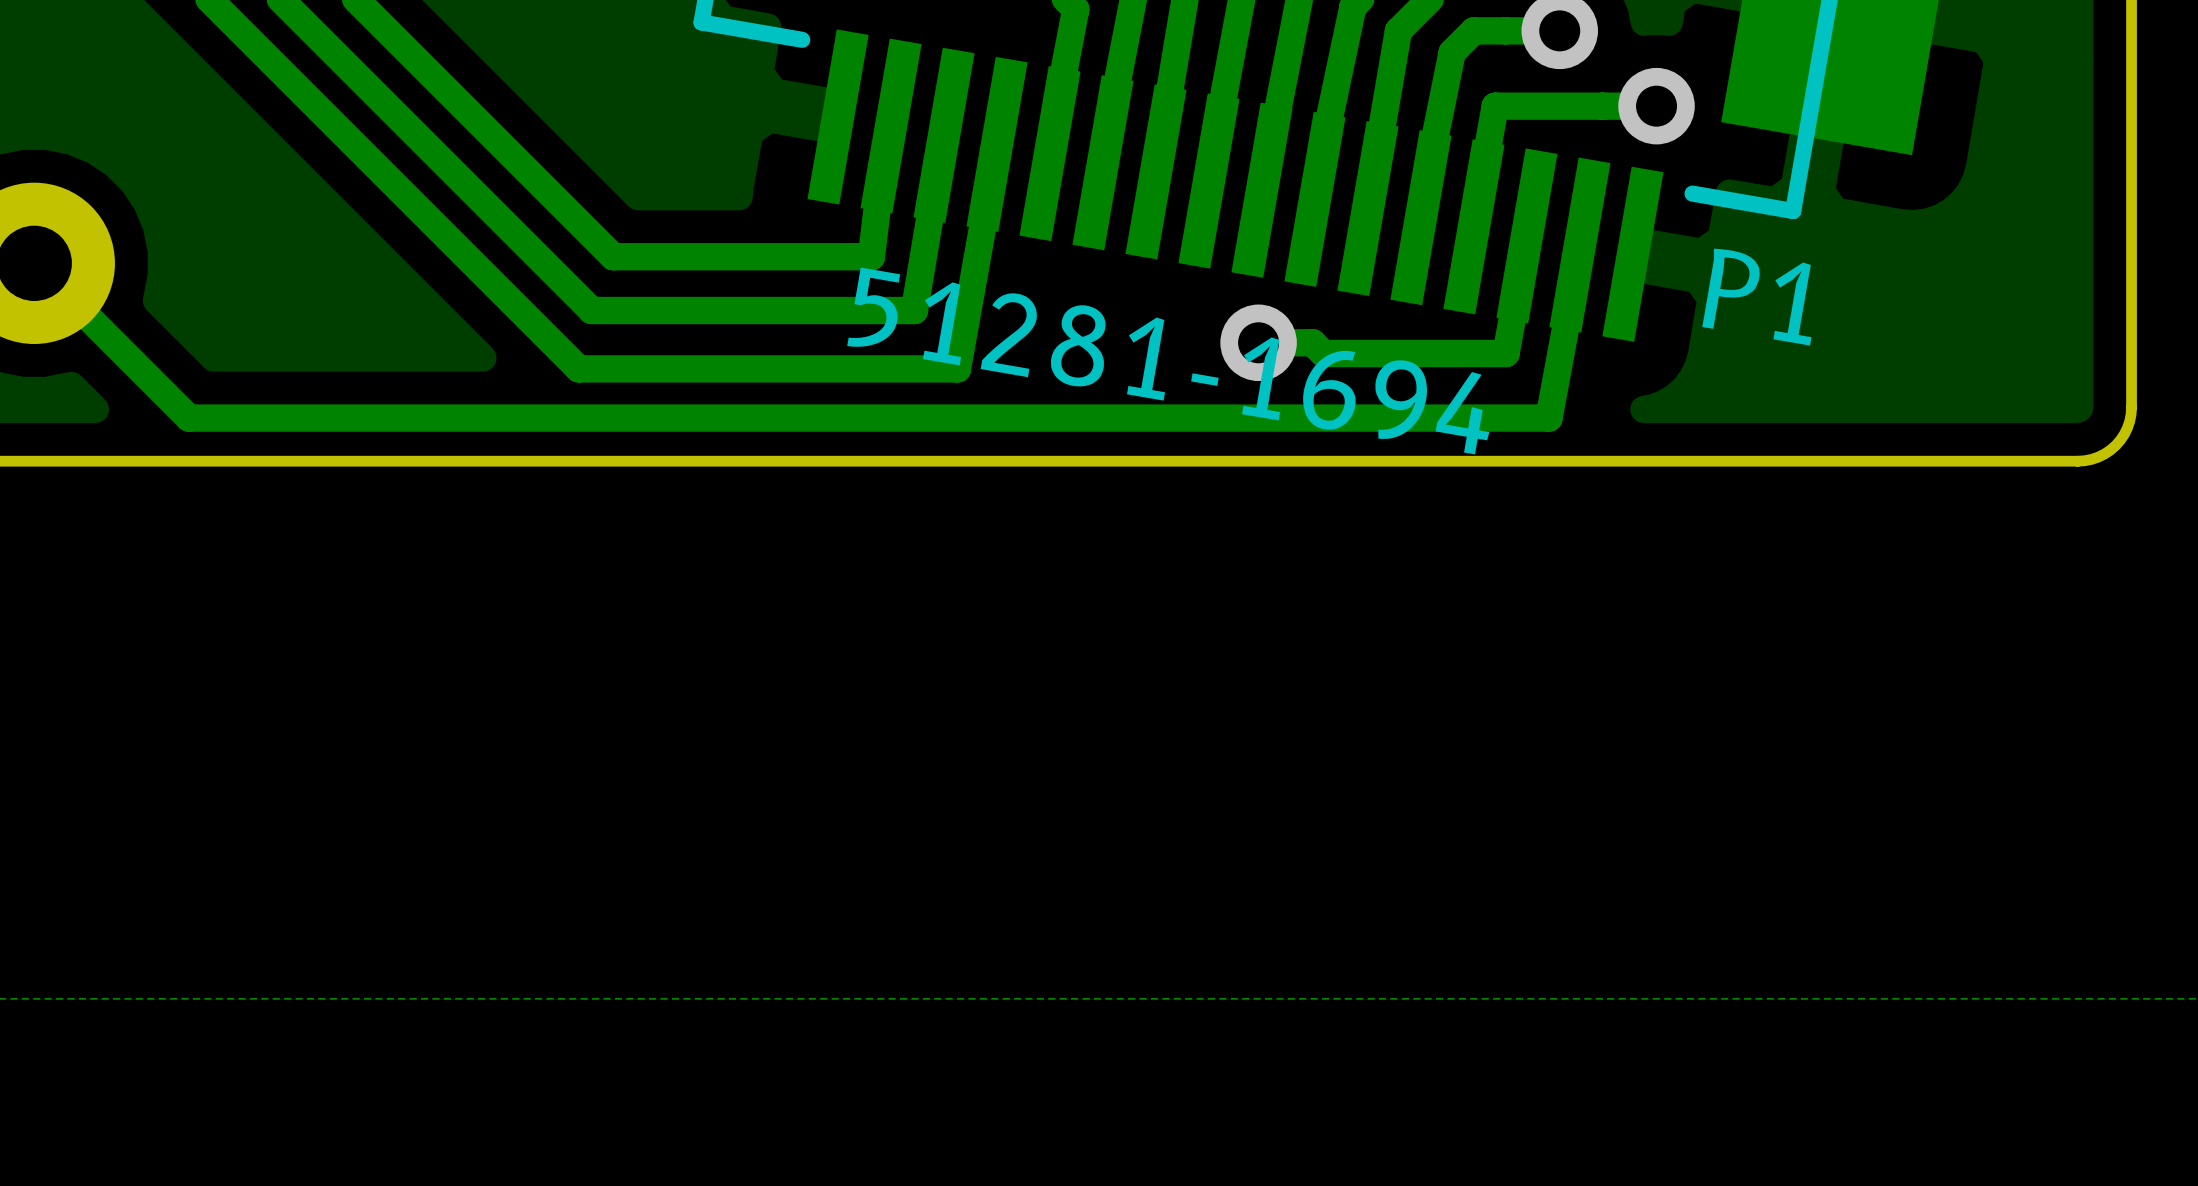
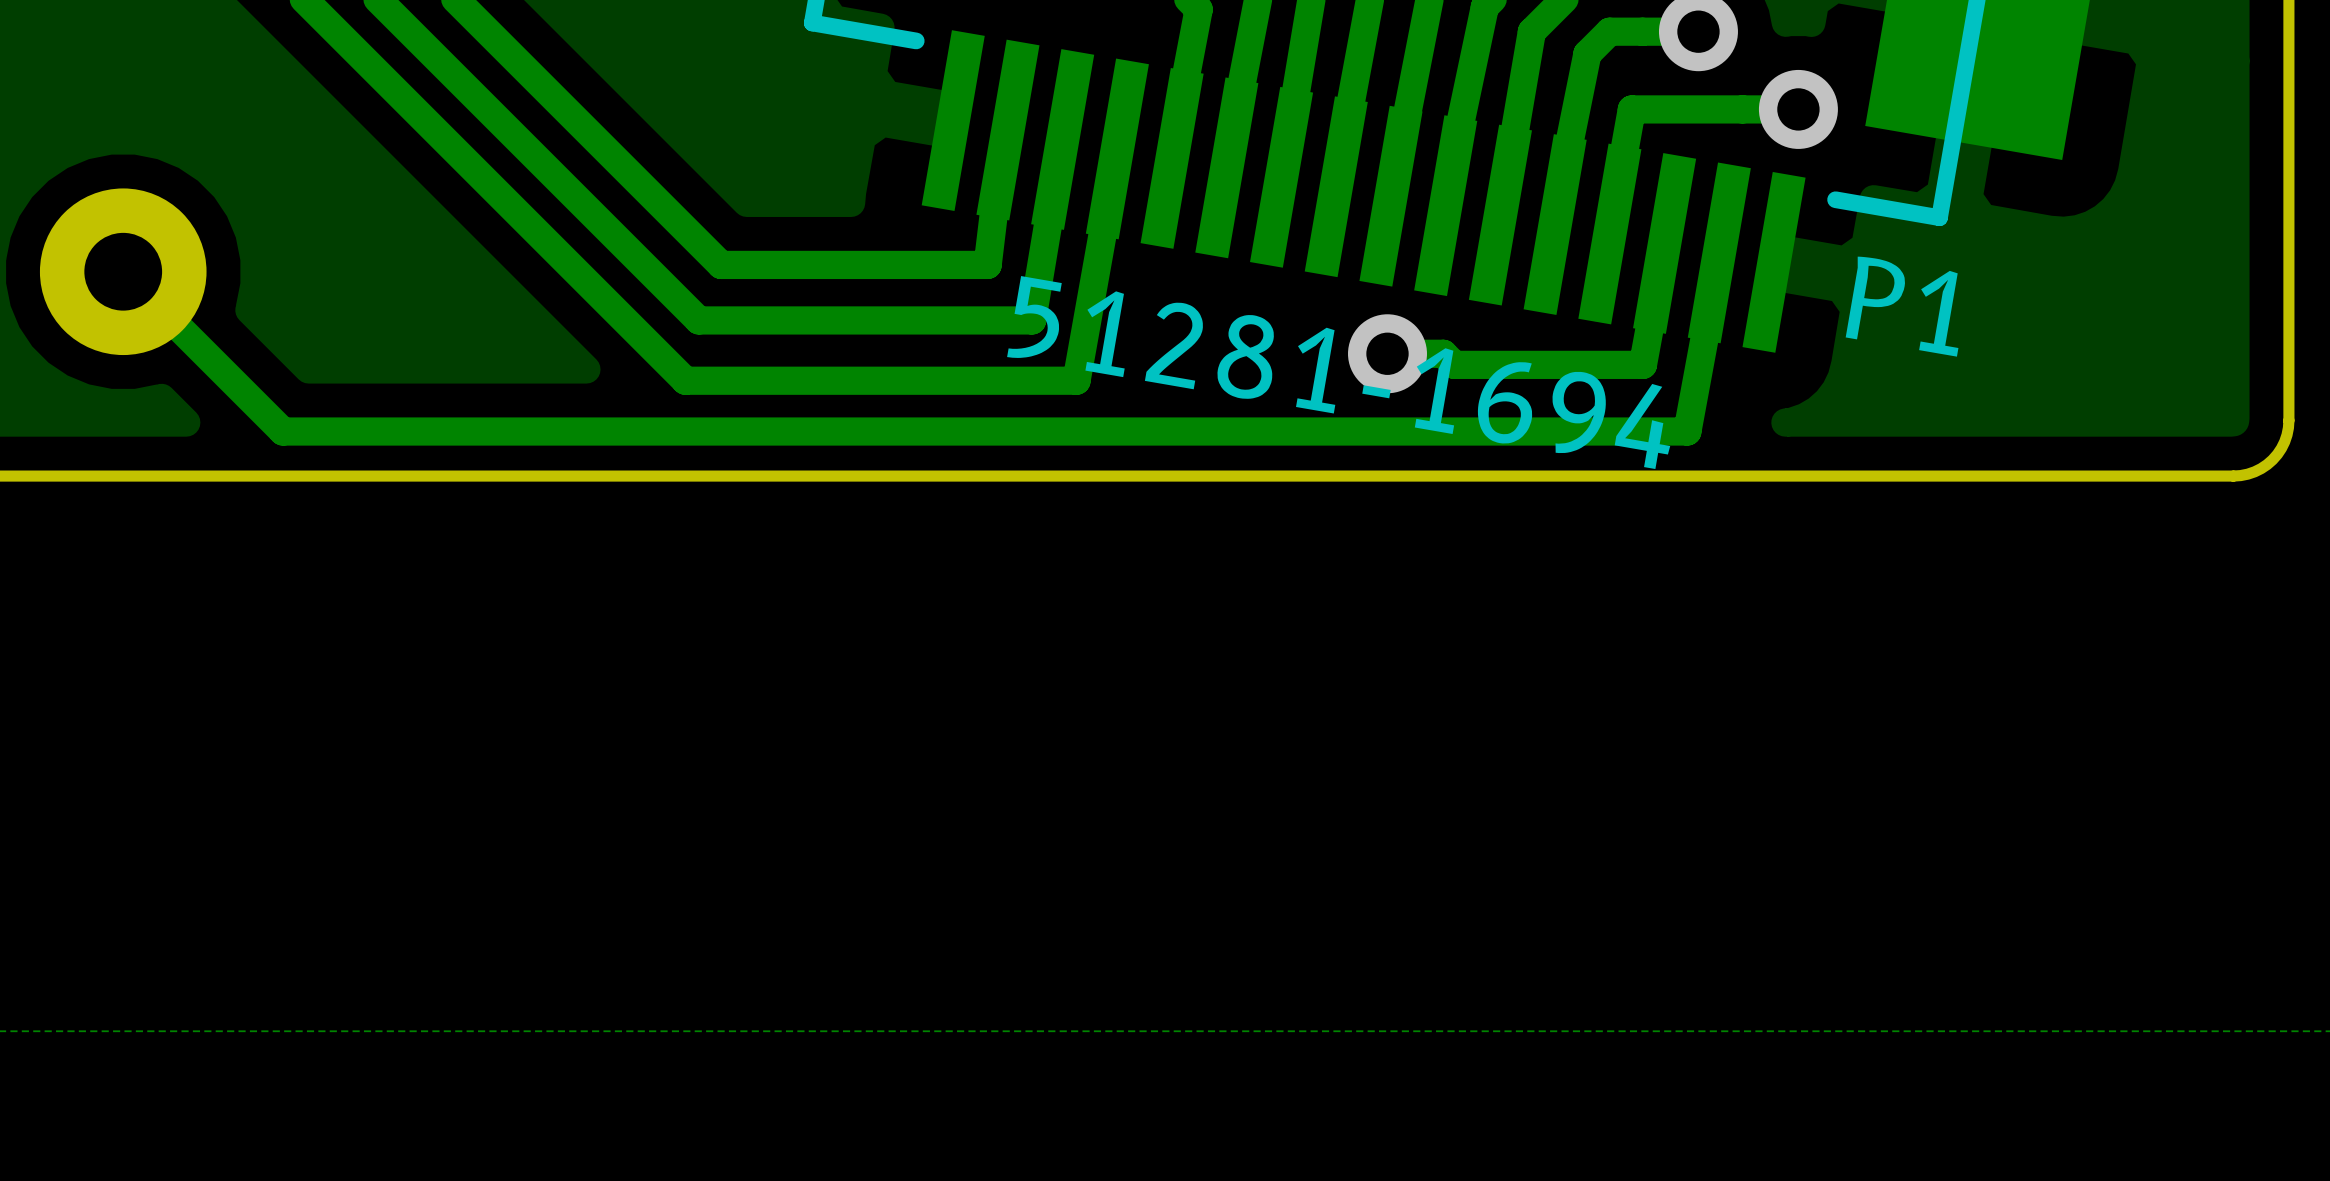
P1 value position: 51281-1694 (1168, 360) -> 51281-1694 (1338, 372)

